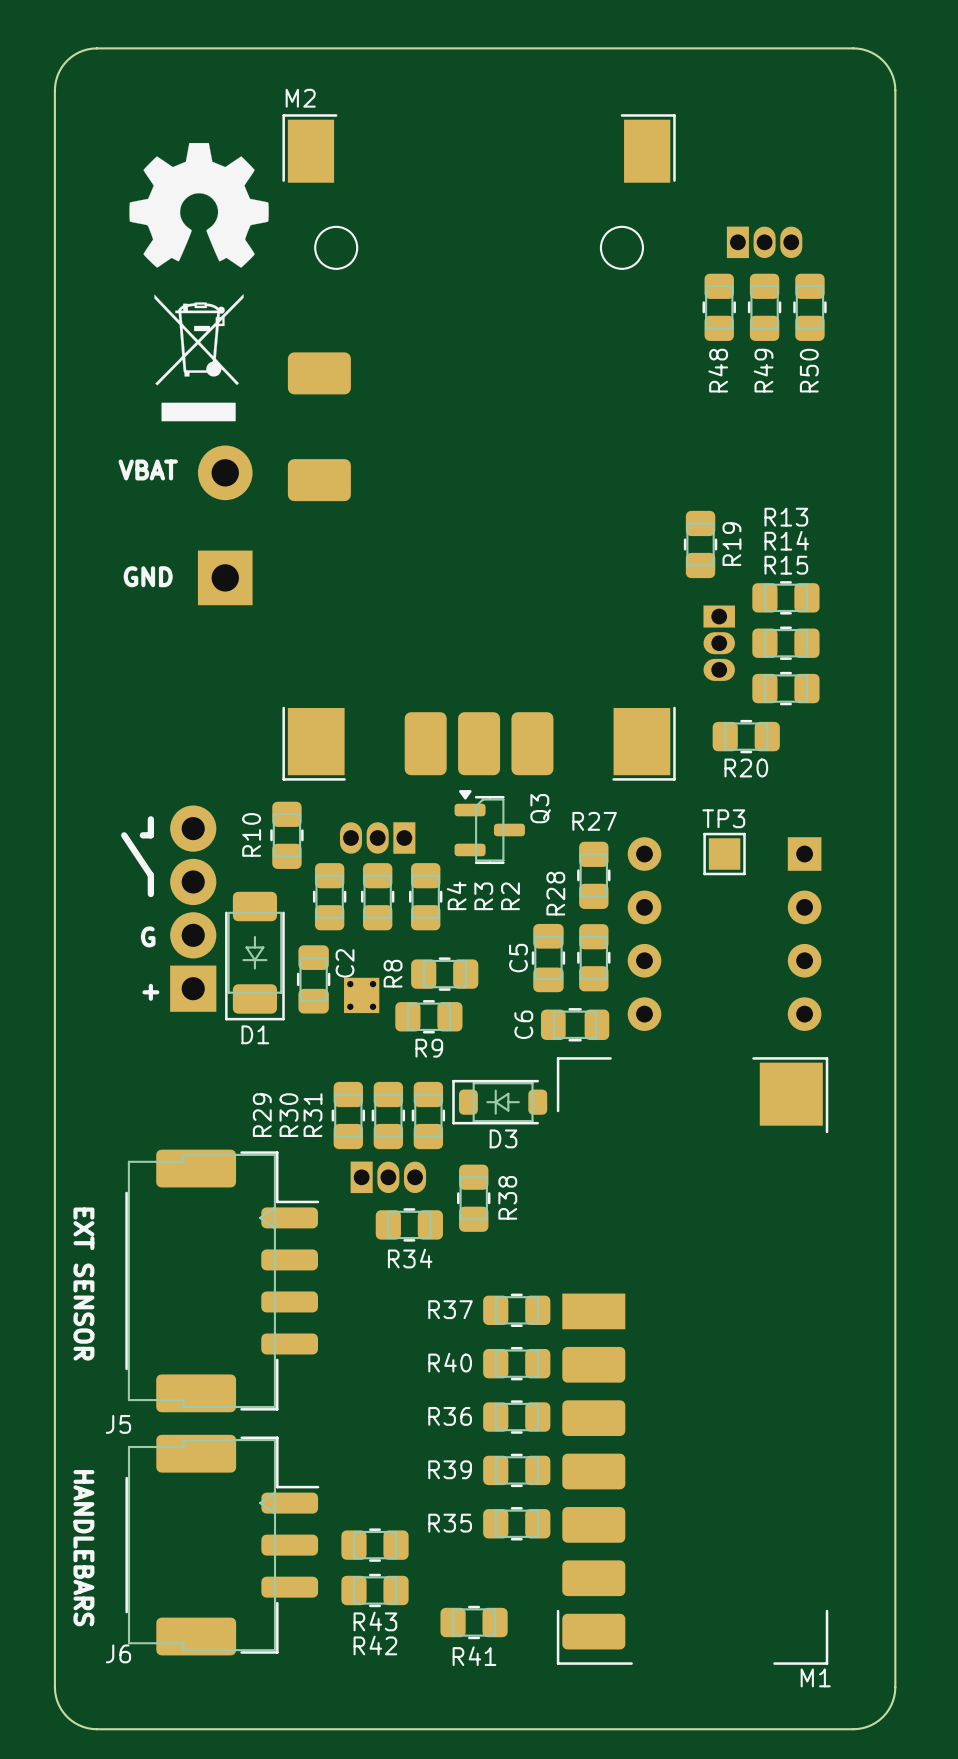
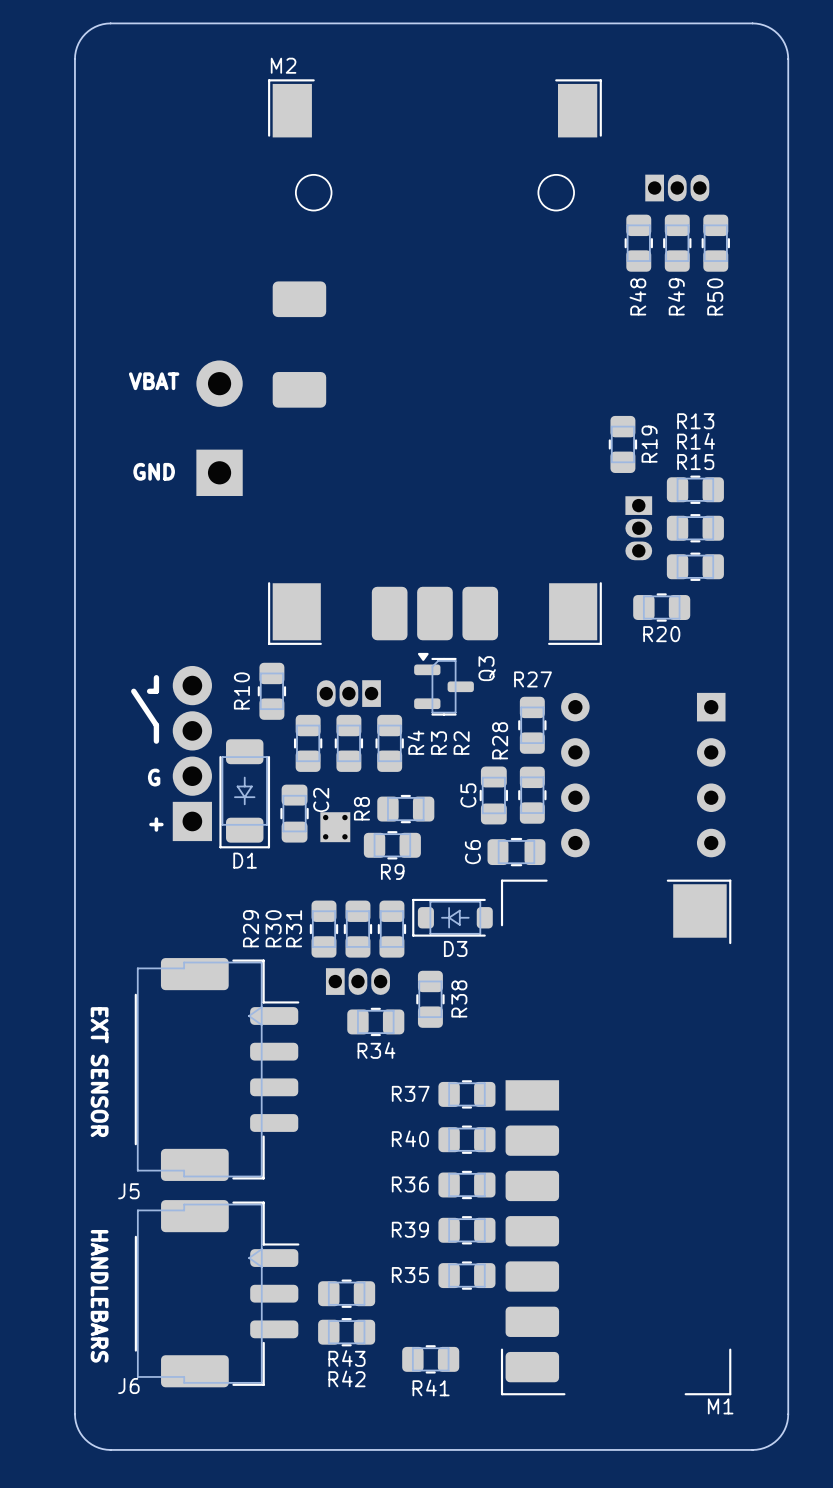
drawing: [129, 142, 269, 268] -> none
drawing: [154, 294, 244, 422] -> none
TP3: (724, 854) -> none

